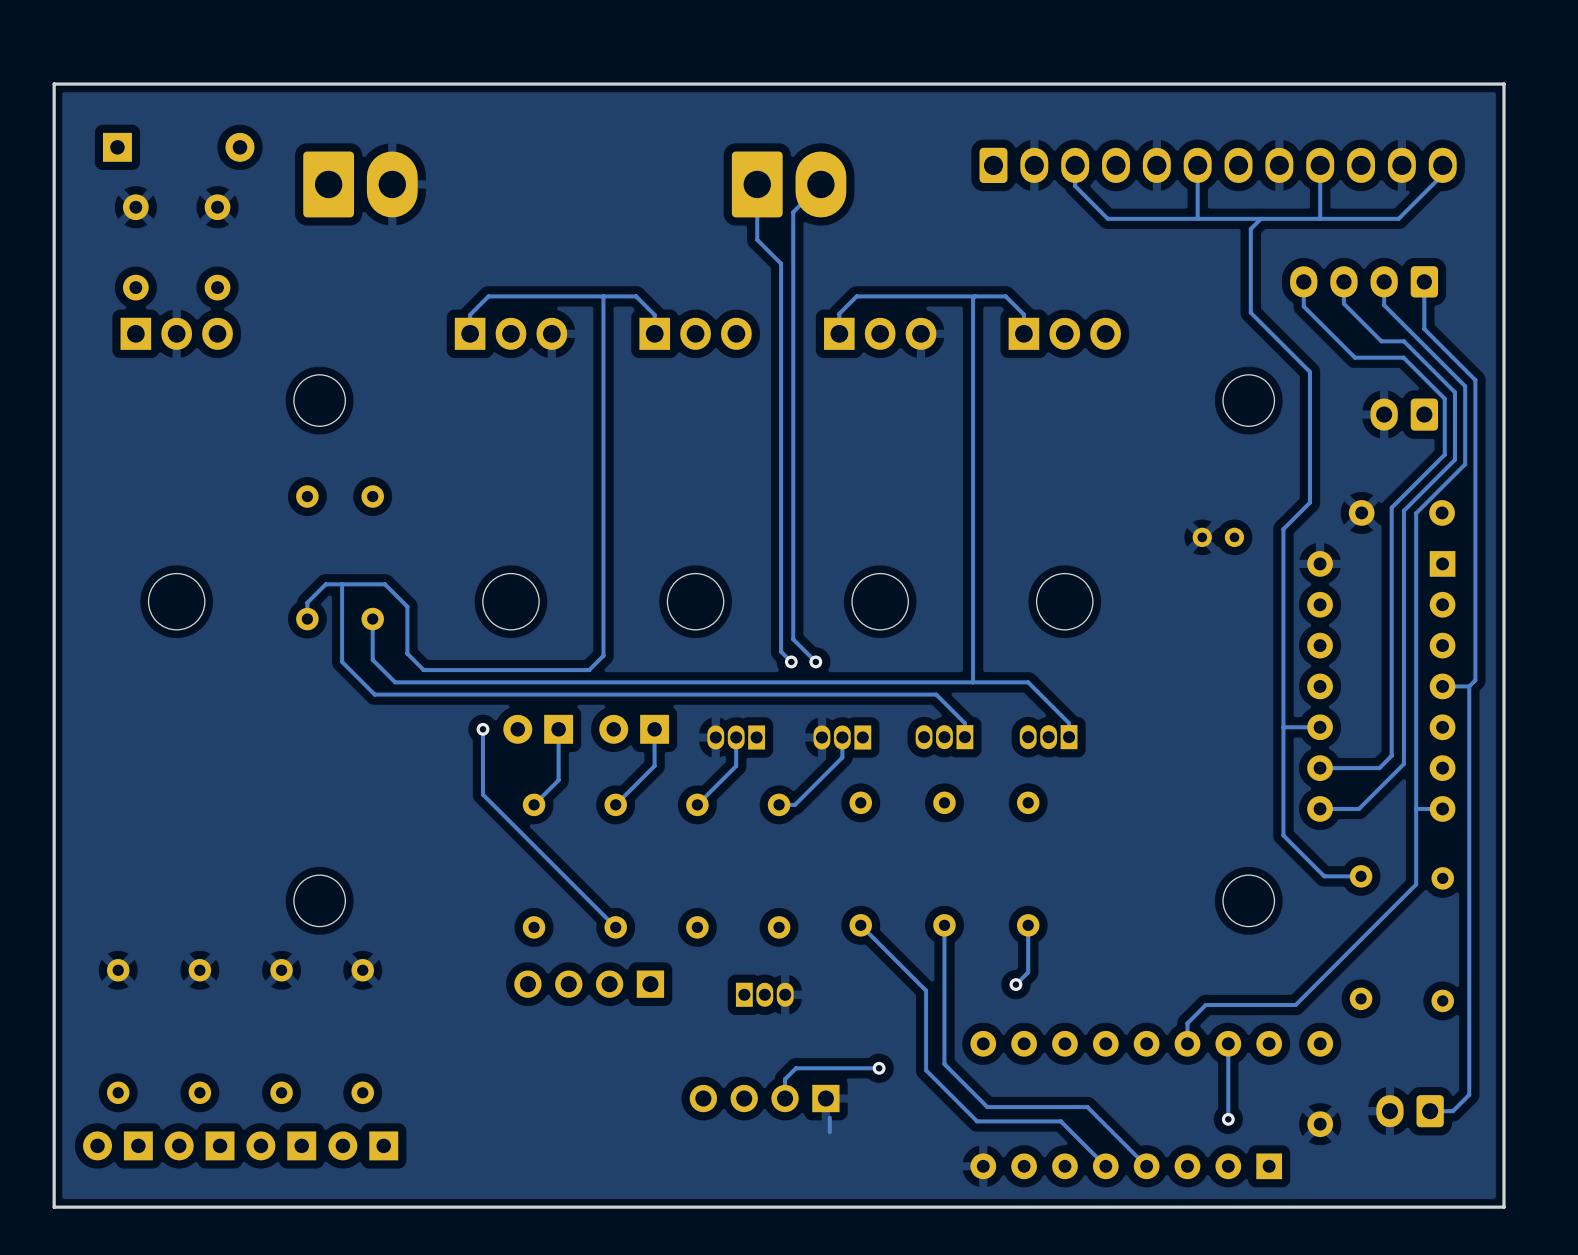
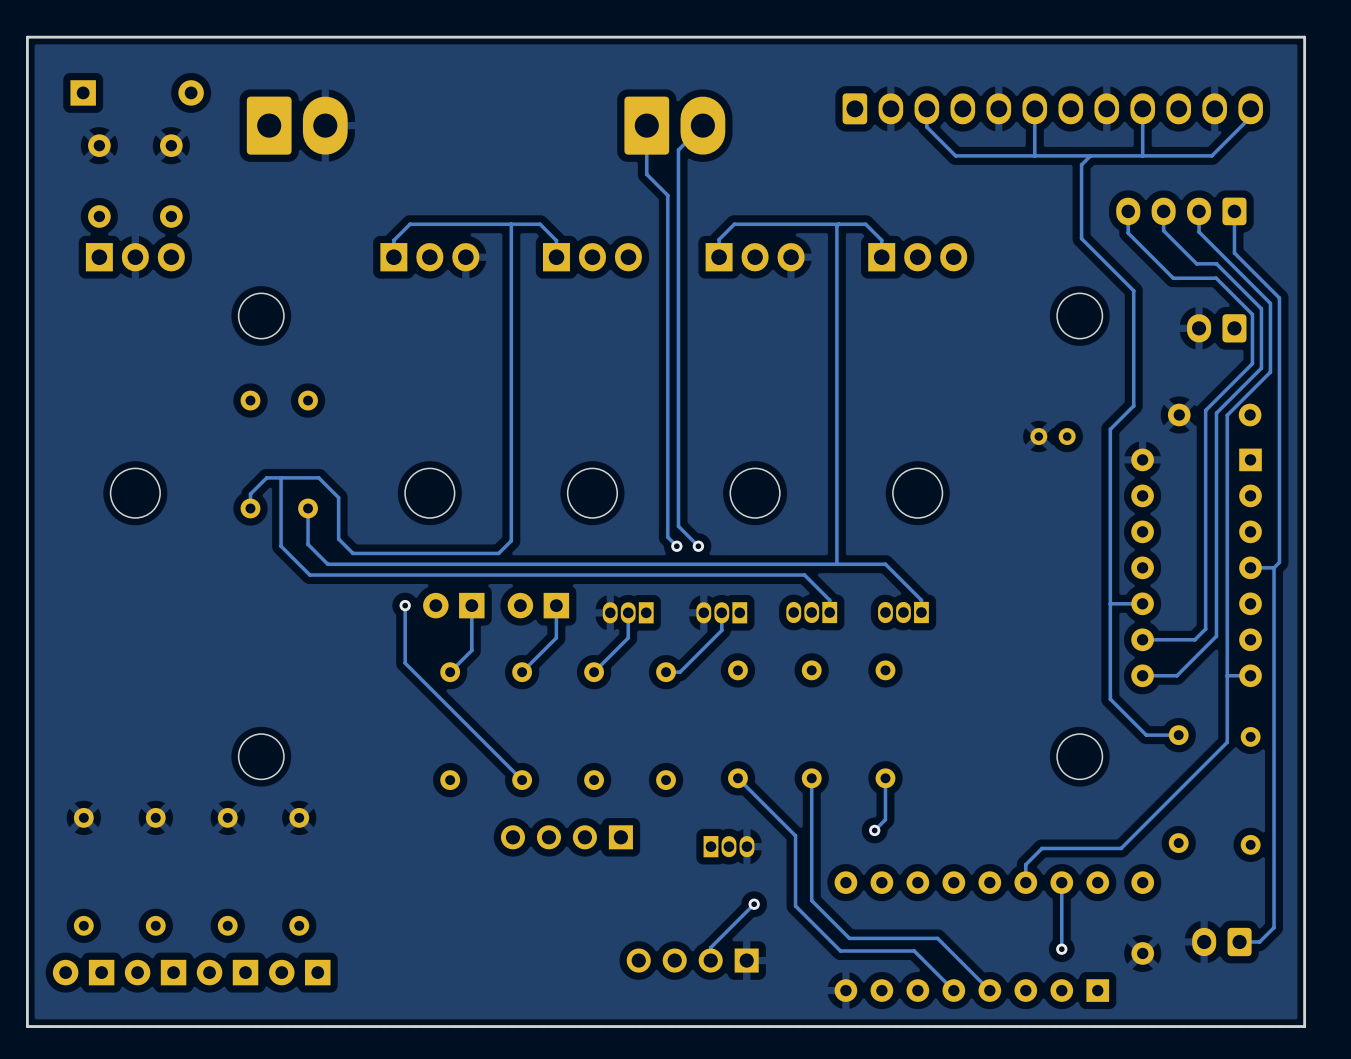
part: (589, 984) -> none
part: none -> (566, 837)
part position: (764, 994) -> (728, 846)
track: (879, 1068) (795, 1068) (785, 1079) (785, 1098) -> (754, 904) (710, 947)
part position: (764, 1098) -> (692, 960)

